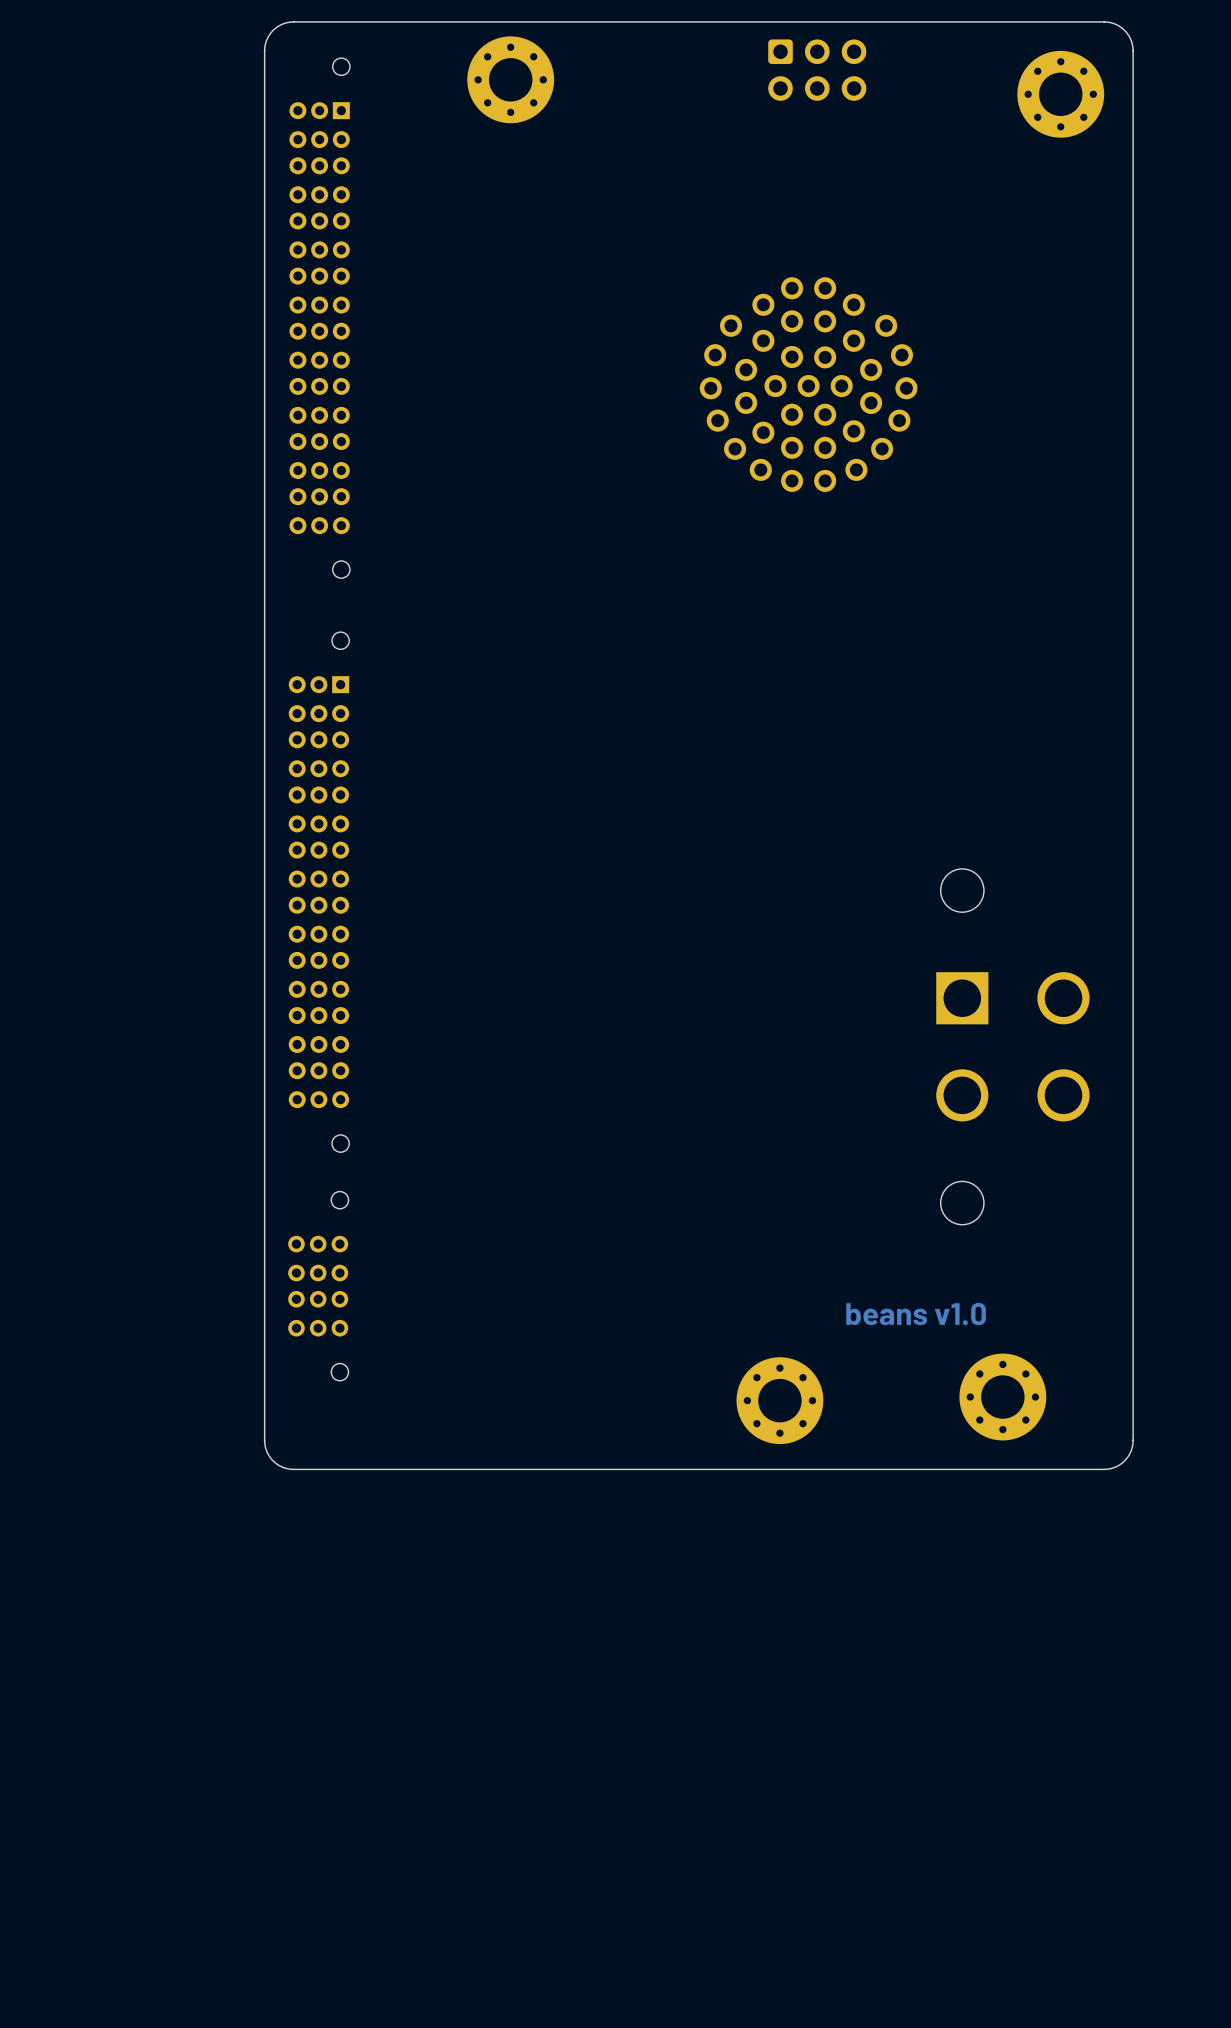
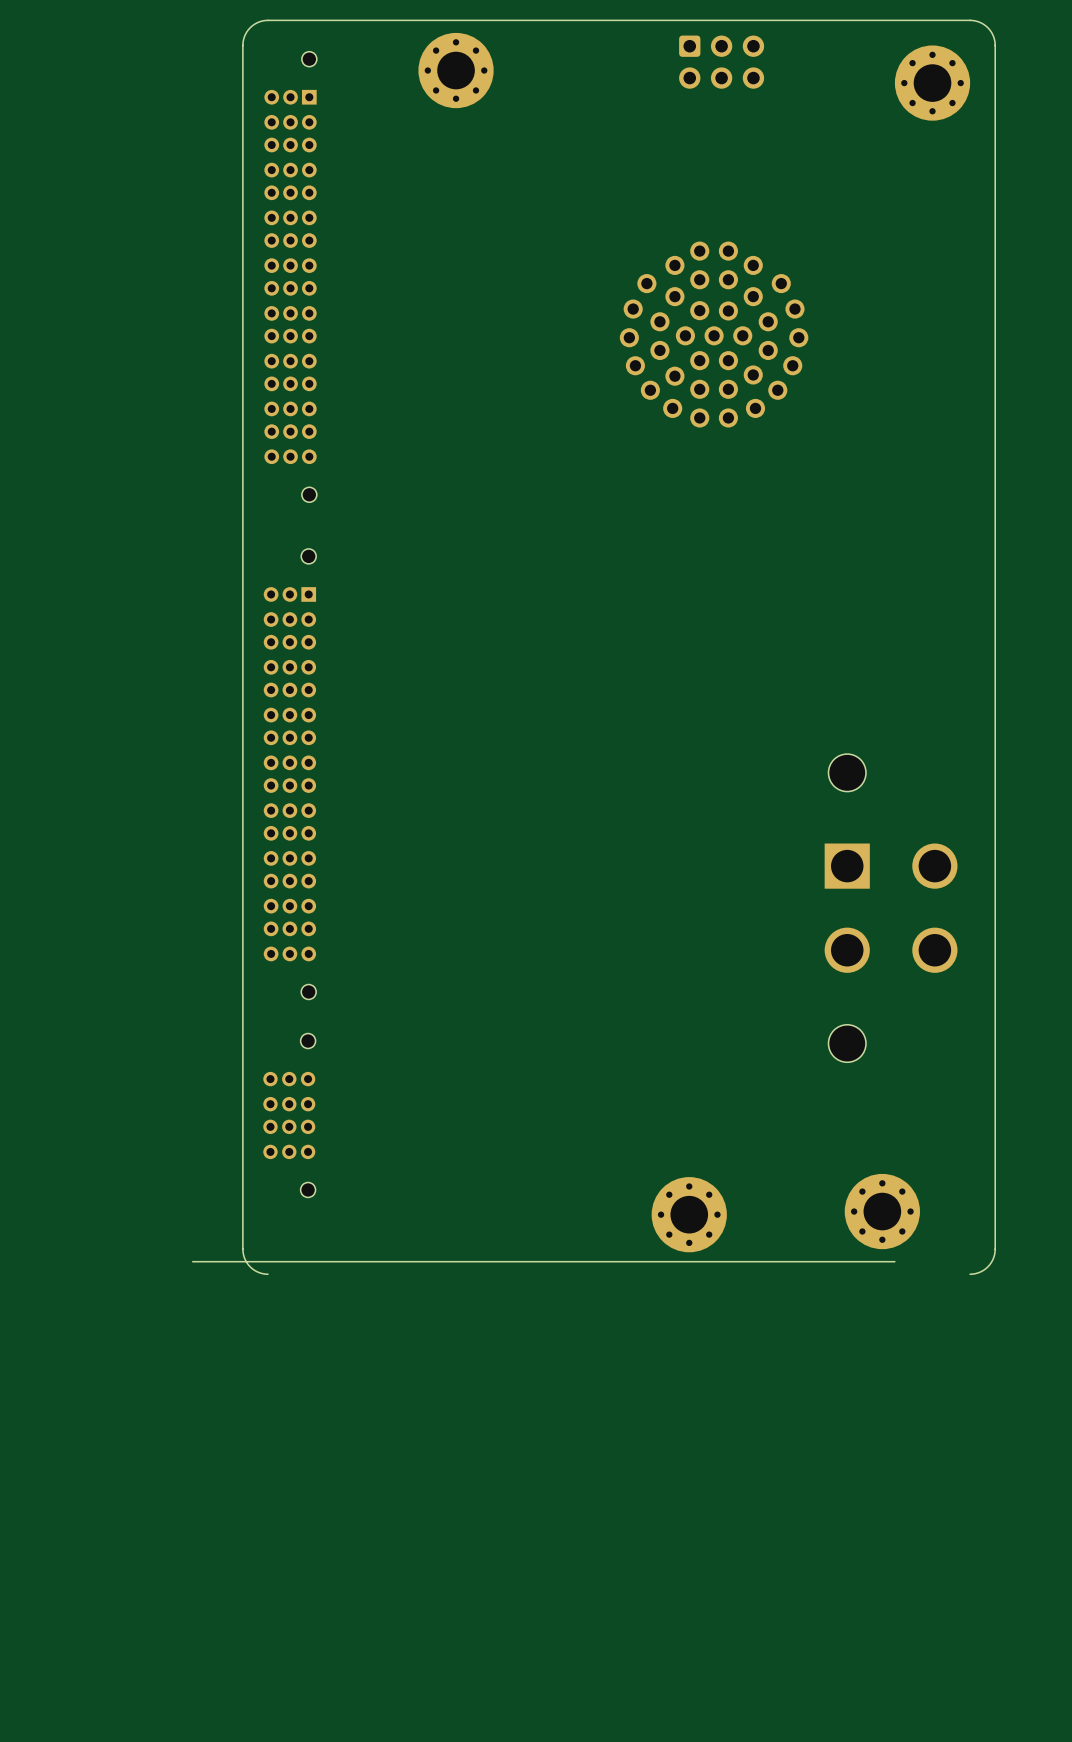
text: beans v1.0 (916, 1314) -> none
board edge: (1104, 1469) (293, 1469) -> (894, 1261) (192, 1261)

